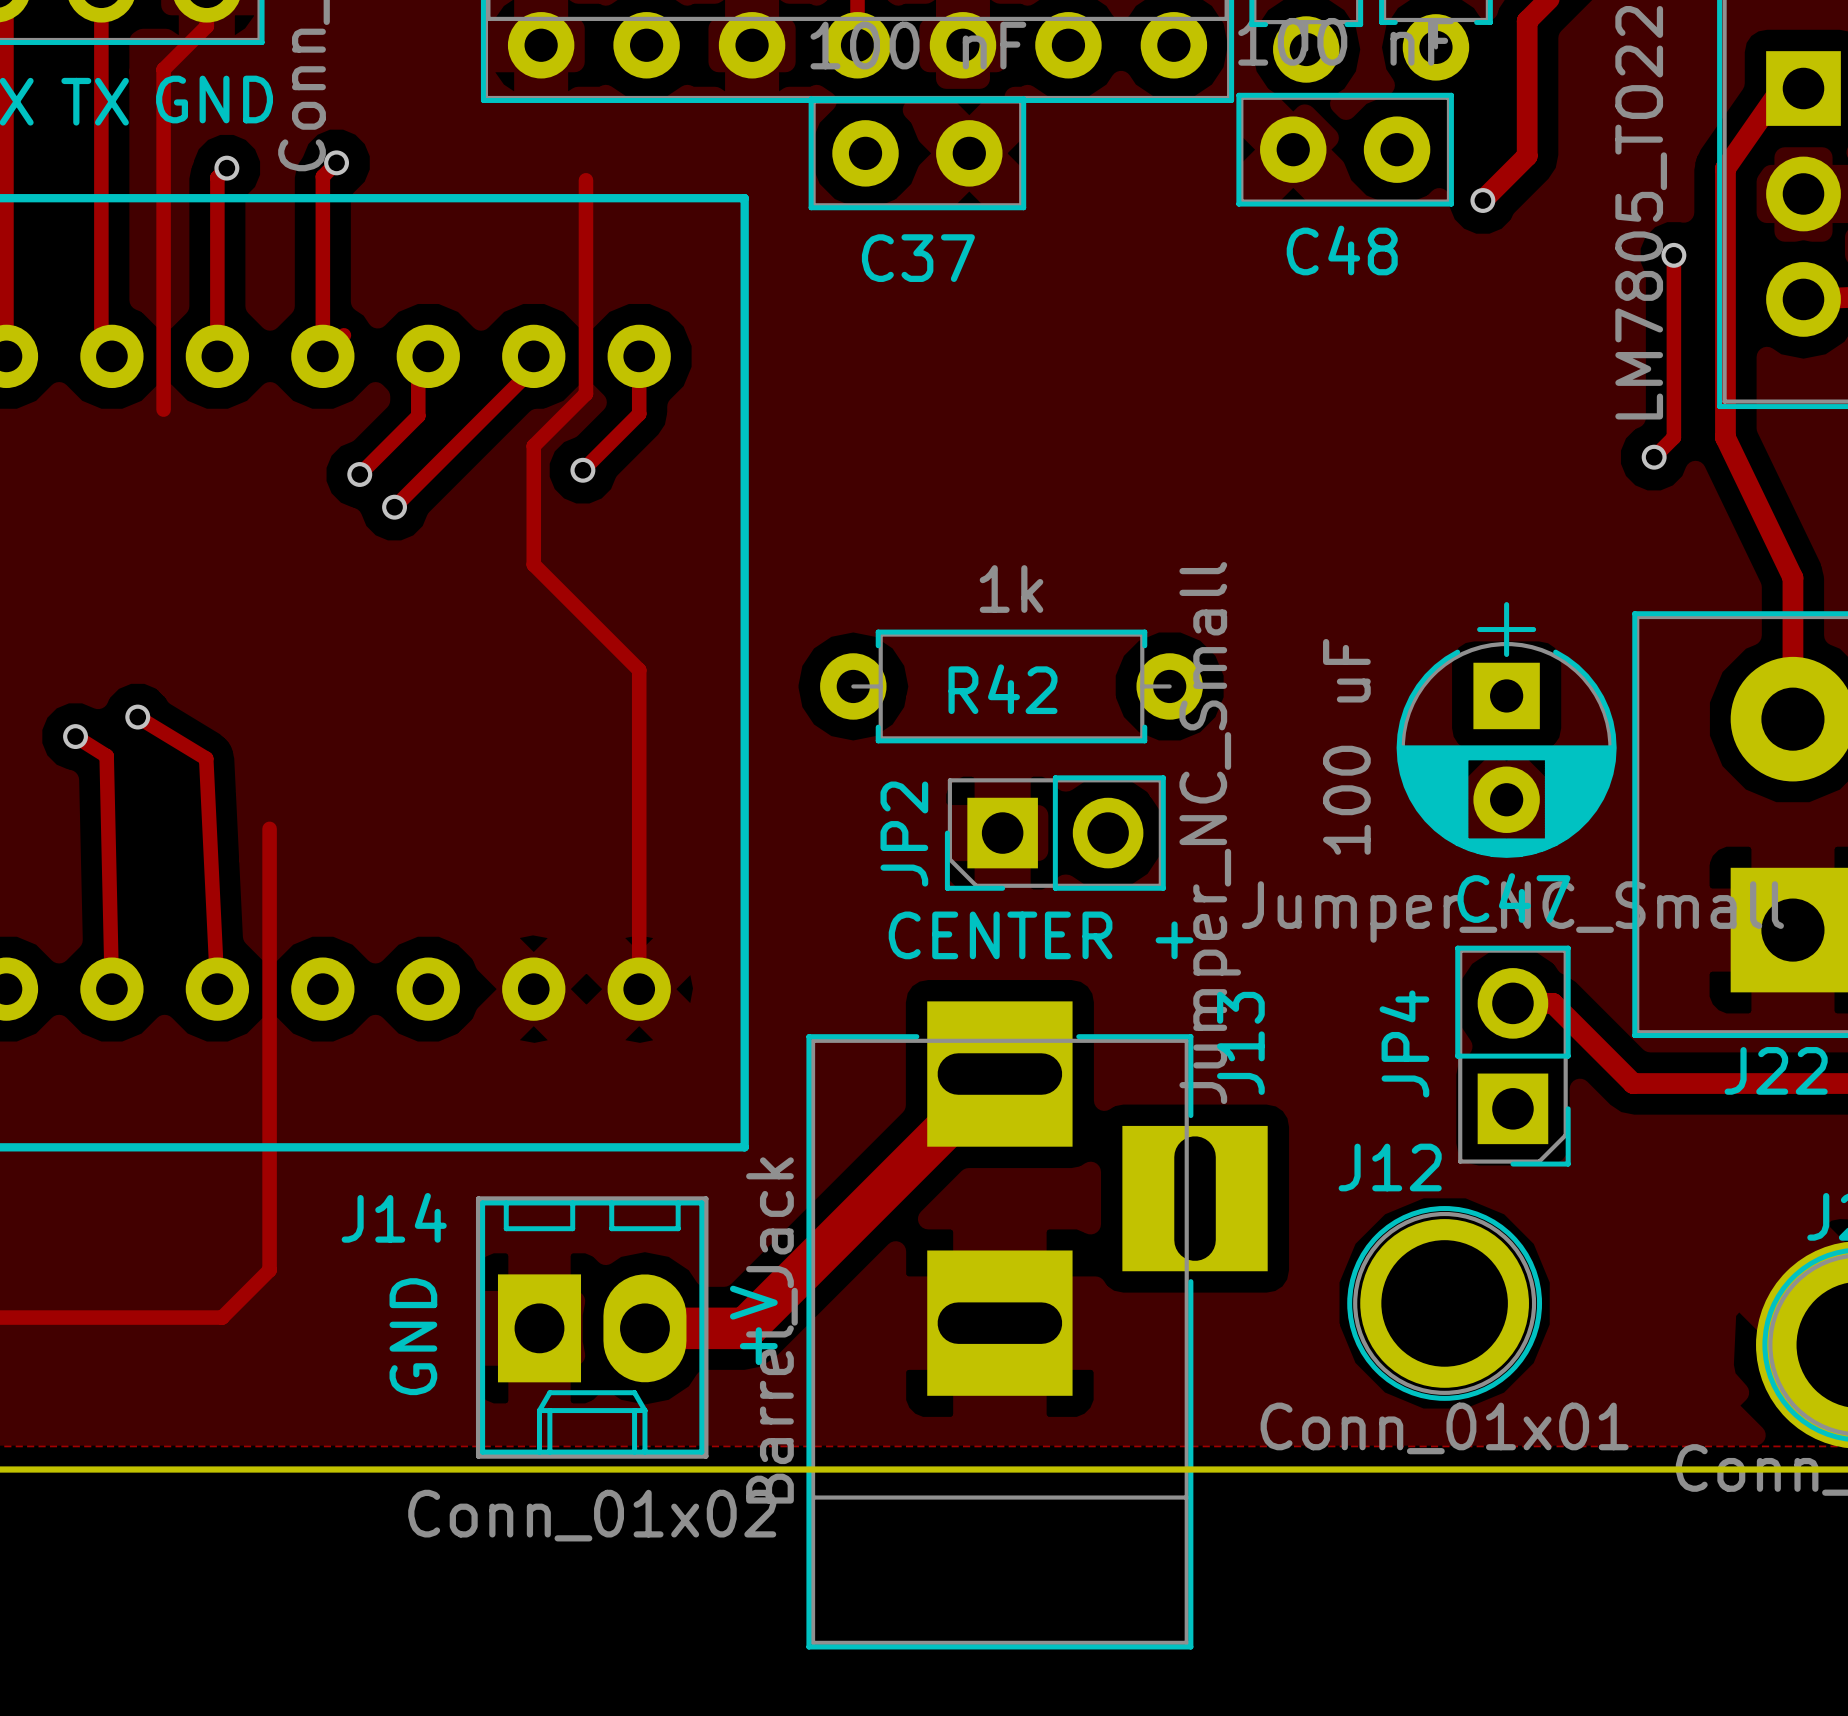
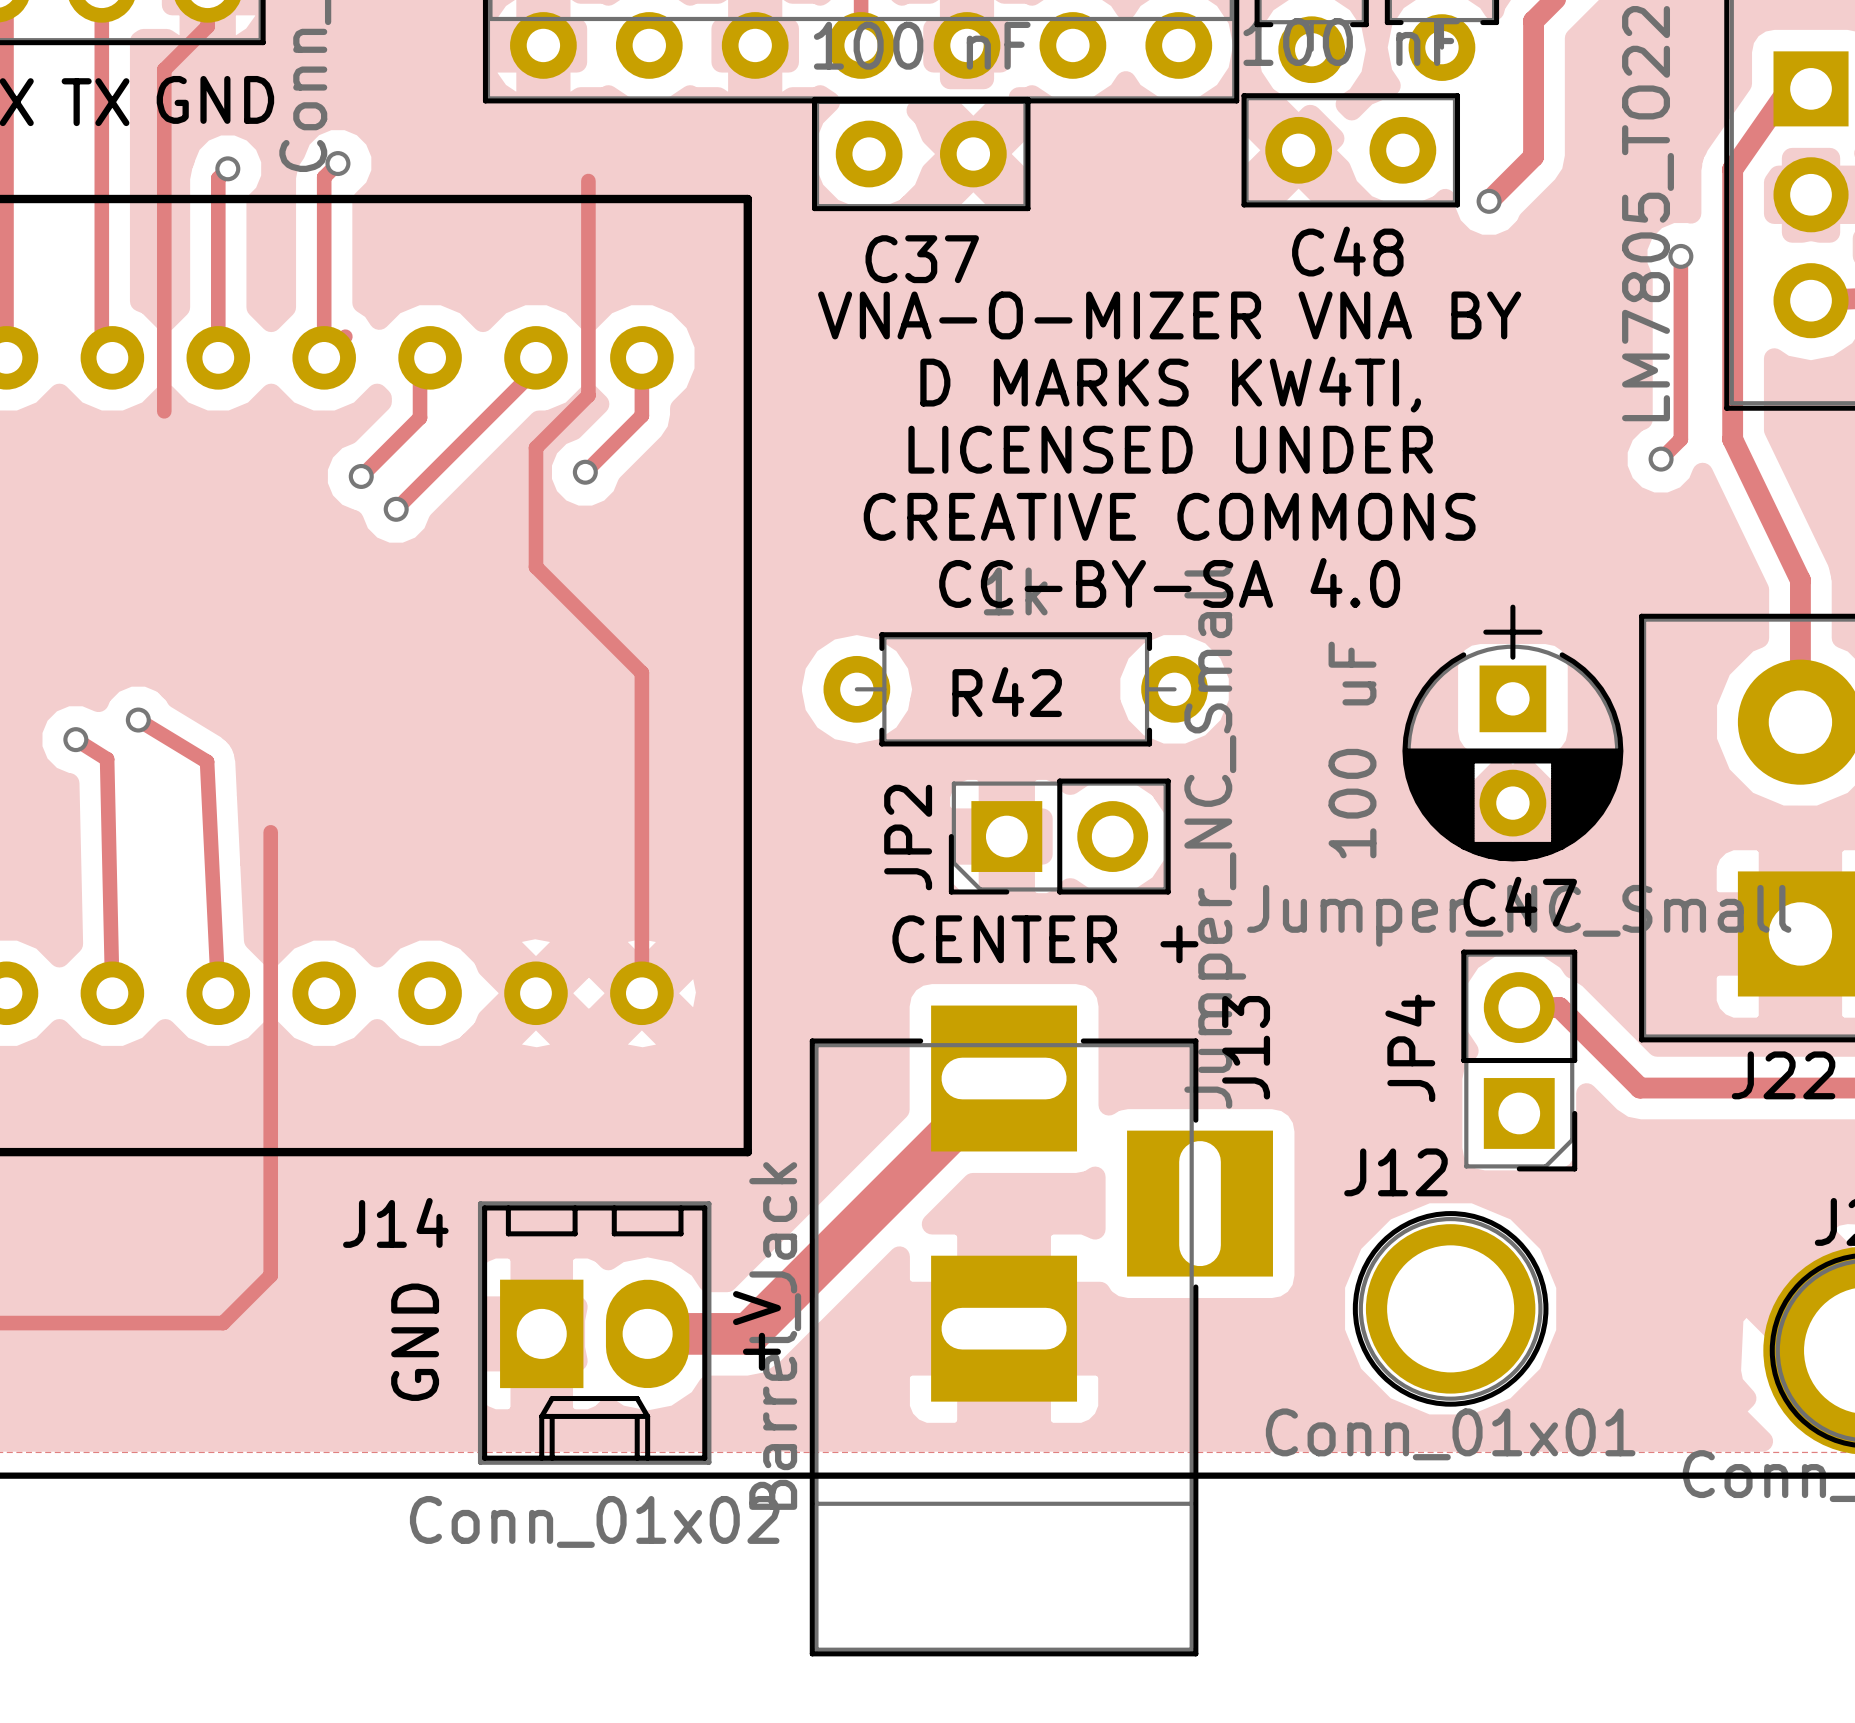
text: none -> VNA-O-MIZER VNA BY (1169, 315)
text: none -> D MARKS KW4TI, (1170, 384)
text: none -> LICENSED UNDER (1170, 449)
text: none -> CREATIVE COMMONS (1169, 516)
text: none -> CC-BY-SA 4.0 (1169, 582)

